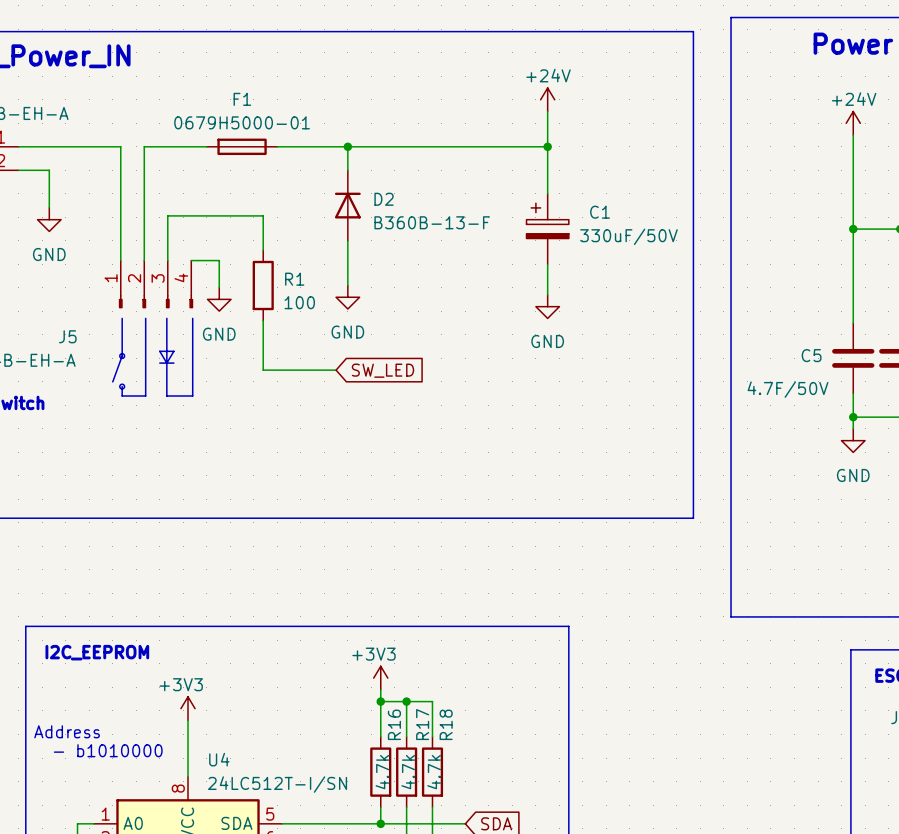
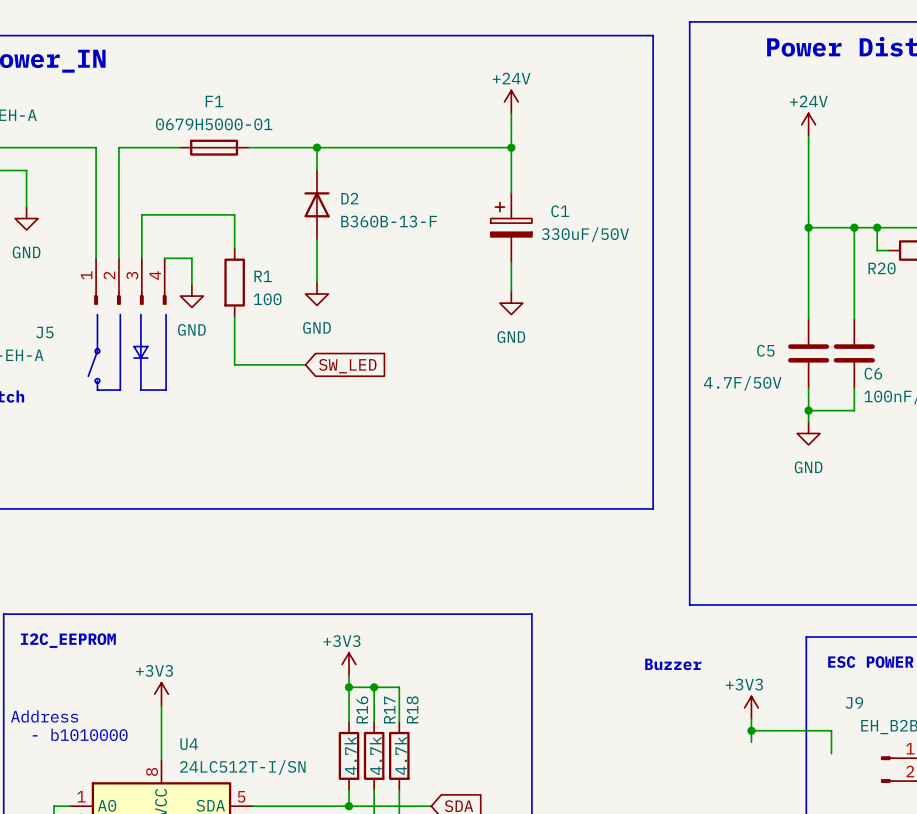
text: none -> Buzzer (673, 664)
power symbol: none -> +3V3 (751, 707)
wire: none -> (751, 719) (751, 742)
wire: none -> (751, 730) (831, 730) (831, 753)
junction: none -> (751, 730)

